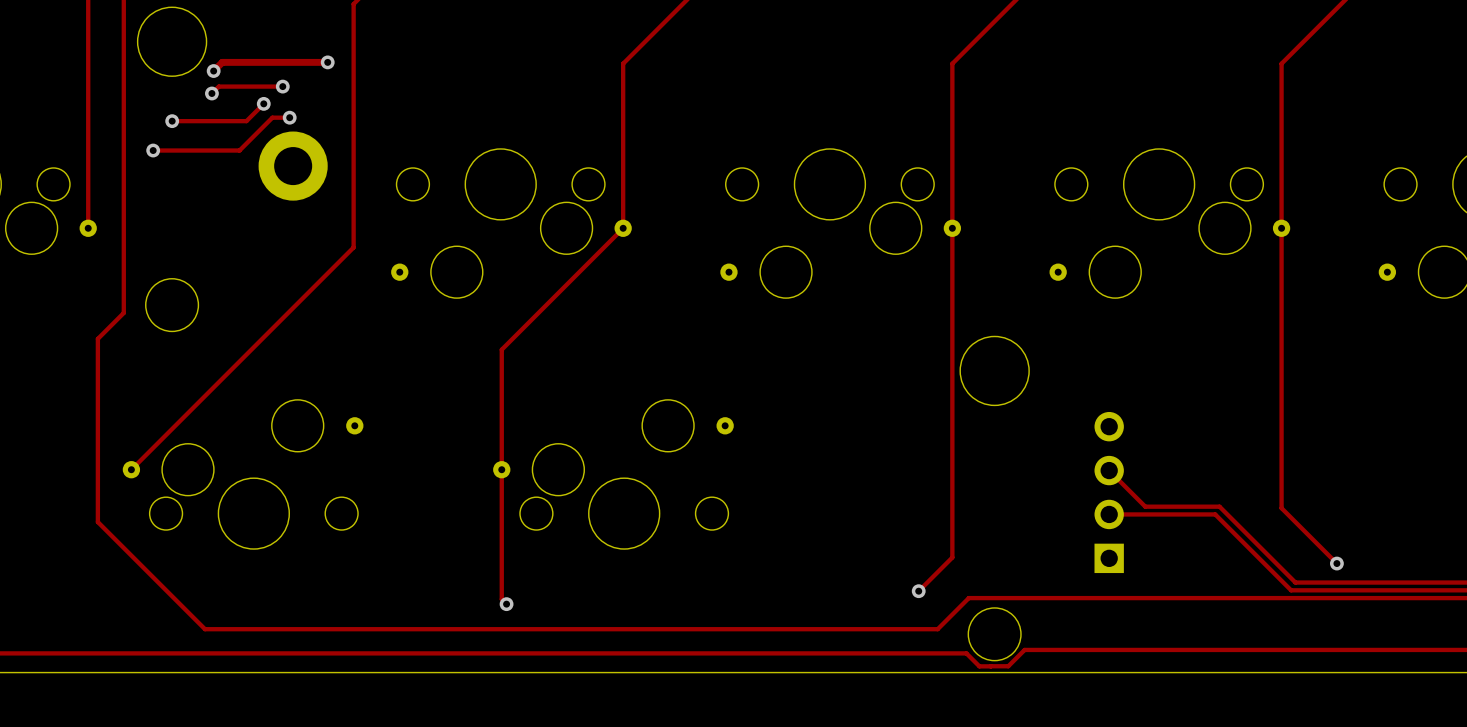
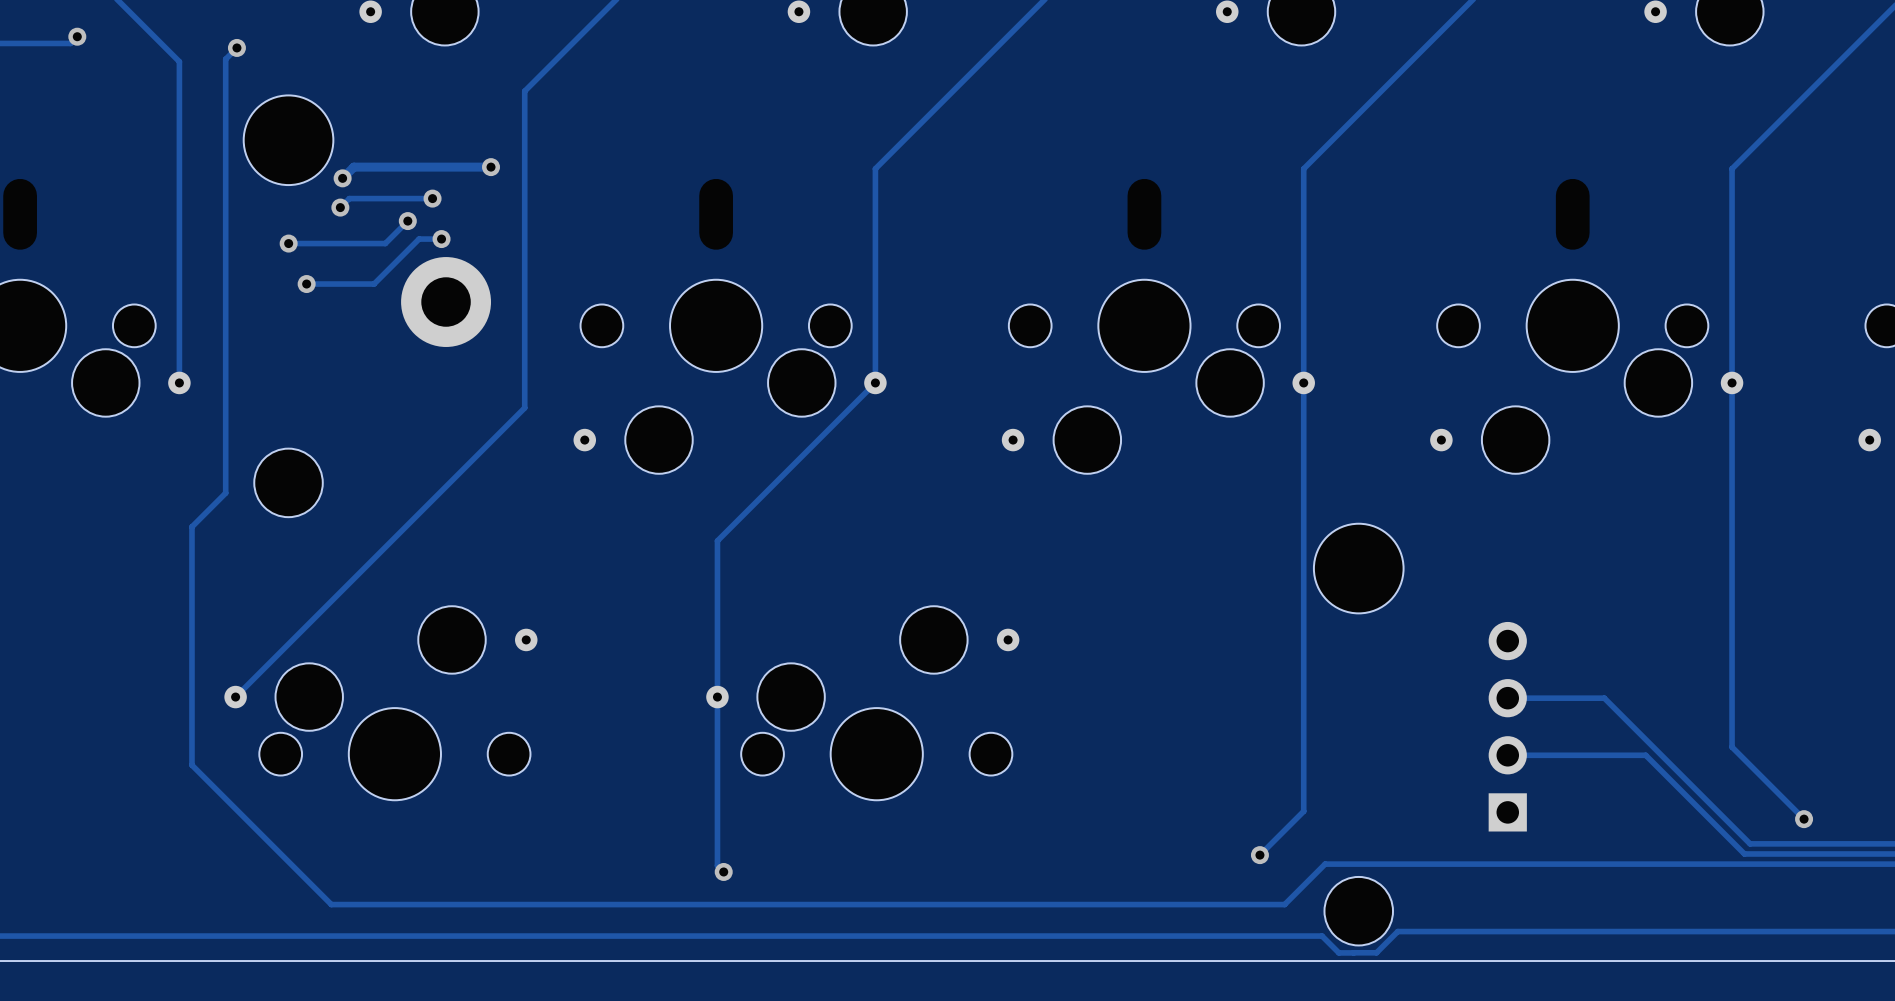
track: (153, 150) (239, 150) -> (306, 284) (374, 284) (376, 281)
via position: (153, 150) -> (306, 284)
track: (1109, 470) (1145, 506) (1219, 506) -> (1507, 698) (1604, 698) (1651, 745)

